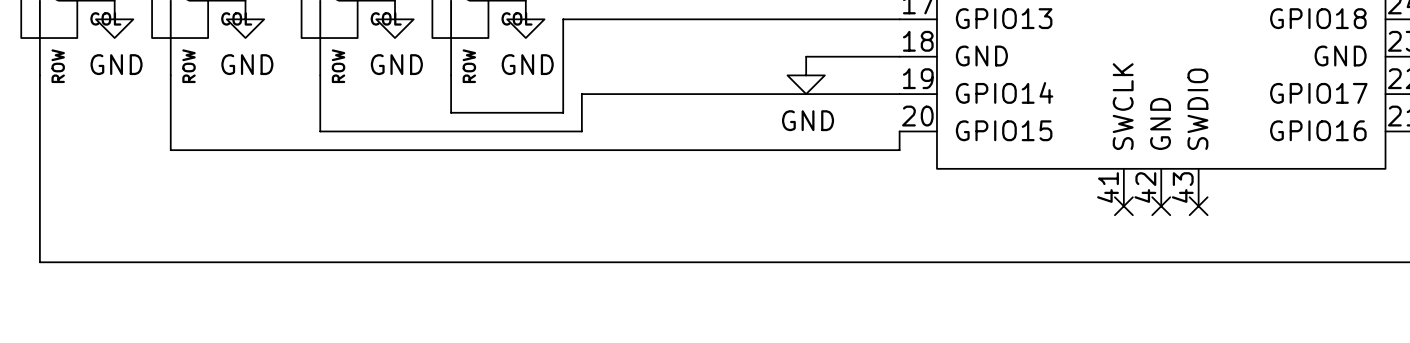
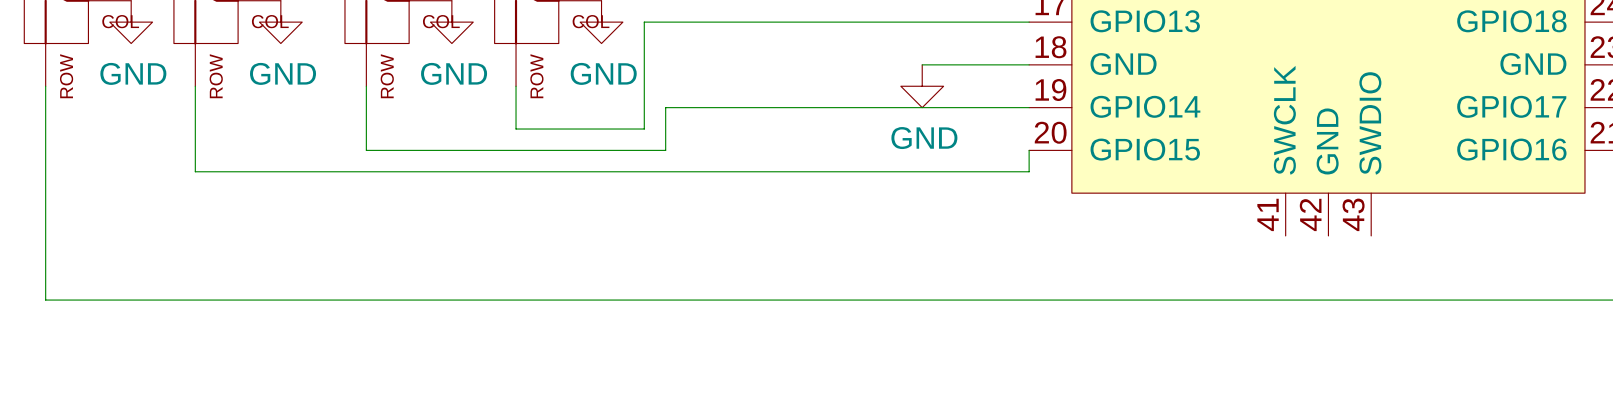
no-connect mark: (1123, 206) -> none
no-connect mark: (1161, 206) -> none
no-connect mark: (1198, 206) -> none

